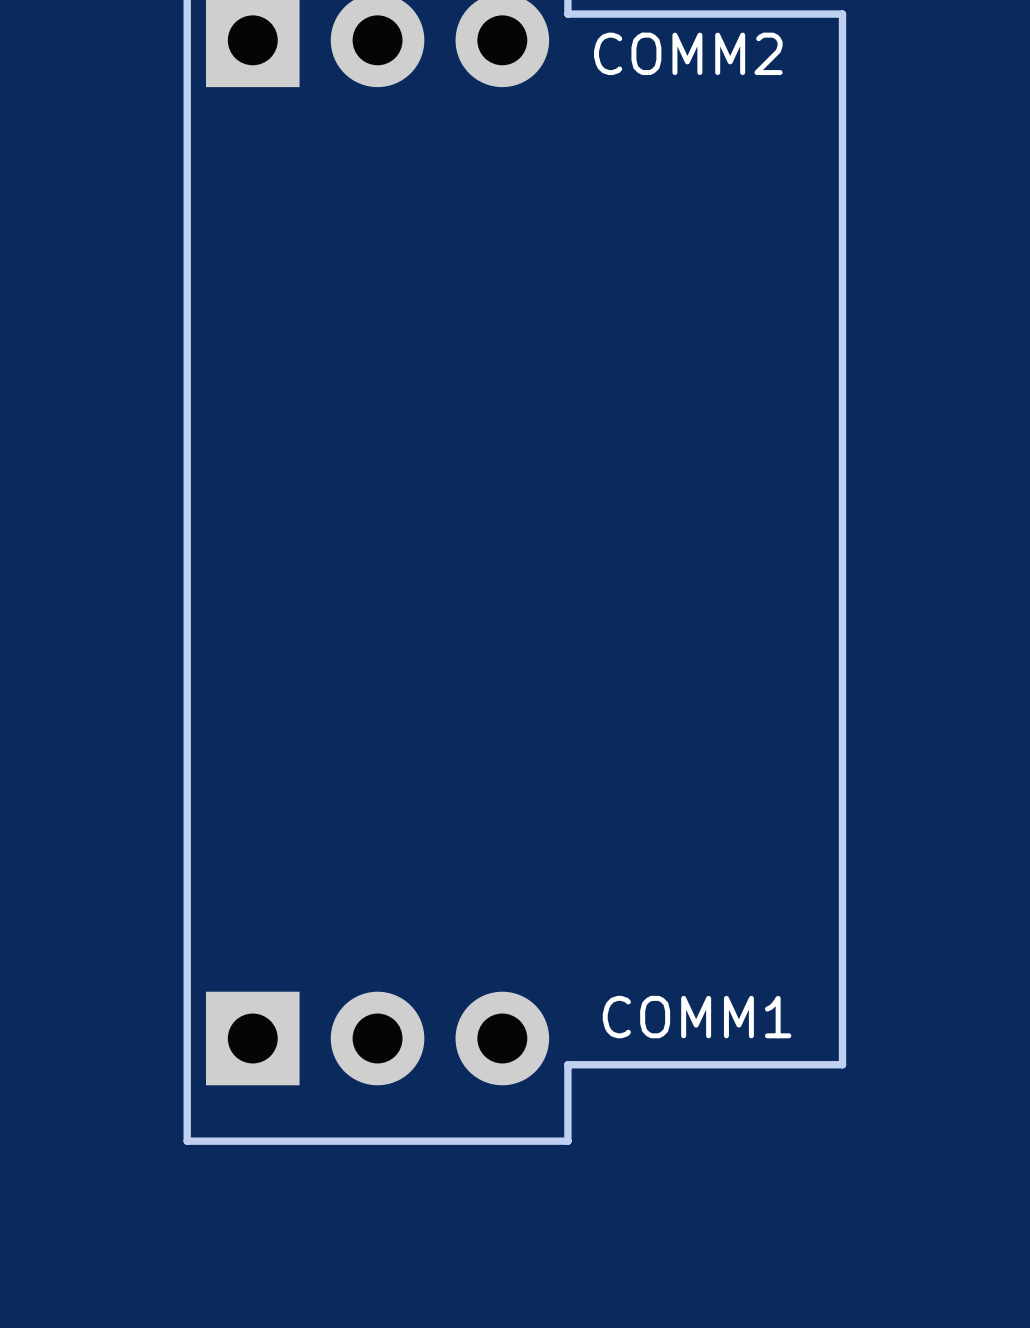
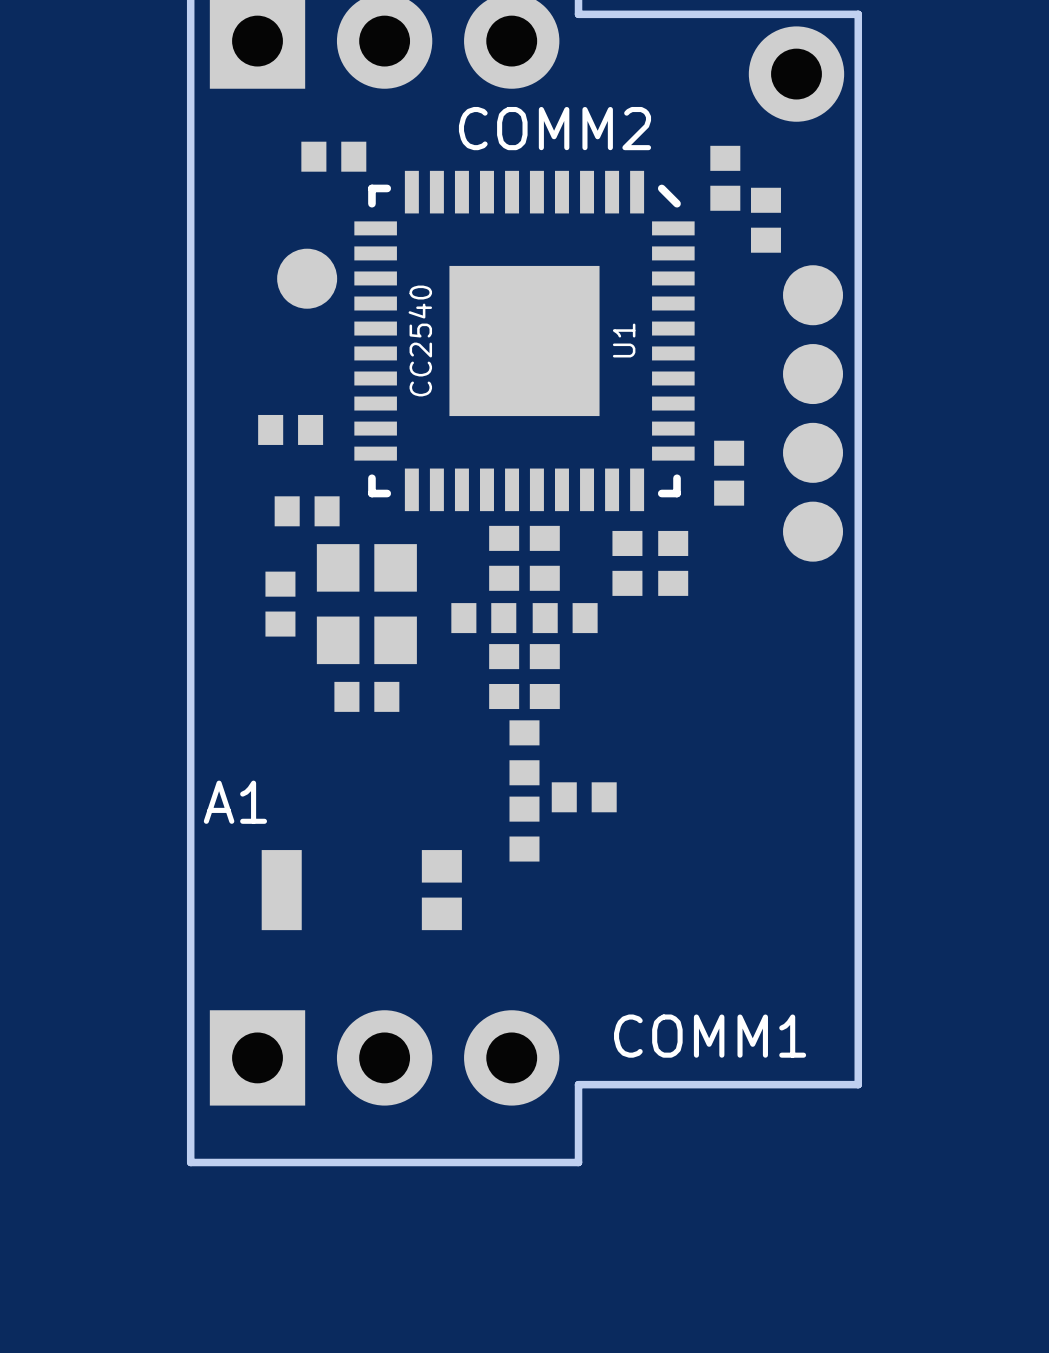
COMM2 name position: COMM2 (688, 53) -> COMM2 (554, 128)
part: none -> (796, 74)
part: none -> (333, 156)
part: none -> (725, 178)
part: none -> (765, 220)
part: none -> (307, 278)
part: none -> (813, 295)
U1: none -> CC2540 (524, 340)
part: none -> (813, 374)
part: none -> (290, 429)
part: none -> (813, 452)
part: none -> (729, 473)
part: none -> (307, 511)
part: none -> (813, 531)
part: none -> (504, 558)
part: none -> (544, 558)
part: none -> (627, 563)
part: none -> (673, 563)
part: none -> (280, 604)
part: none -> (366, 604)
part: none -> (483, 618)
part: none -> (565, 618)
part: none -> (504, 676)
part: none -> (544, 676)
part: none -> (366, 696)
part: none -> (524, 752)
part: none -> (584, 797)
part: none -> (524, 829)
A1: none -> (361, 890)

